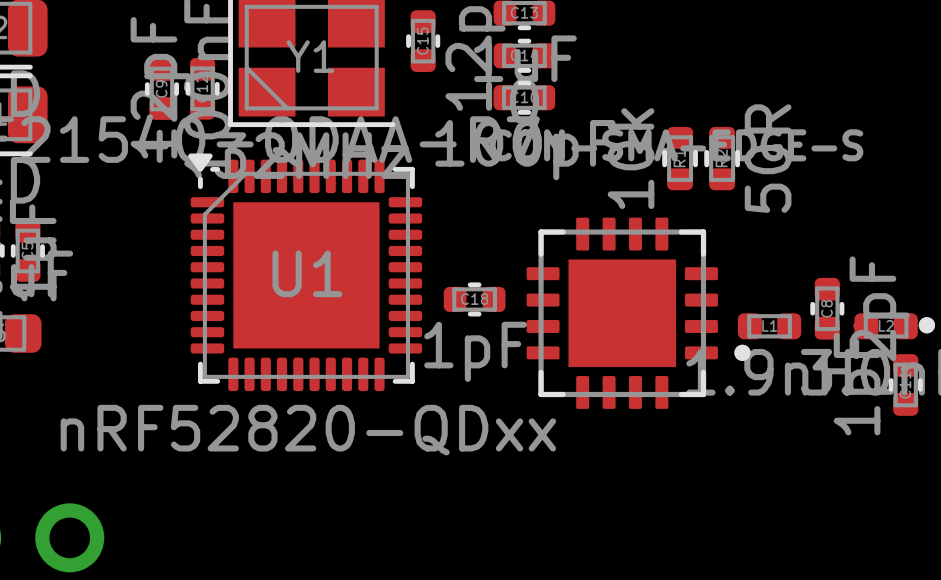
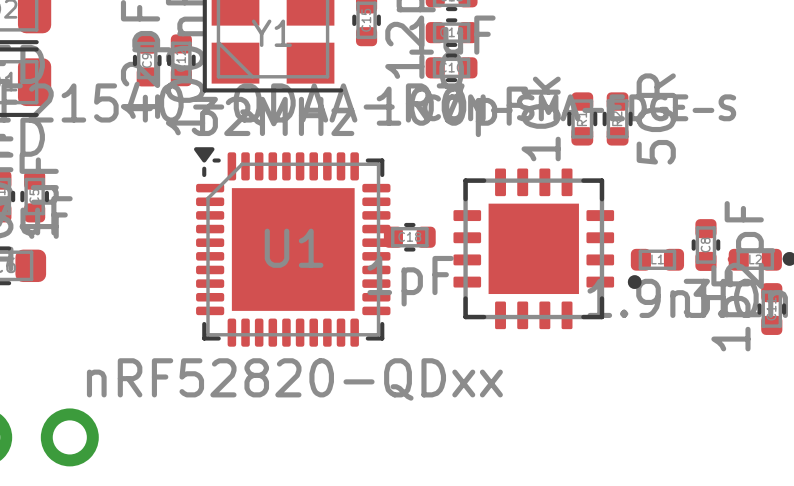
U1 position: (305, 272) -> (292, 246)

